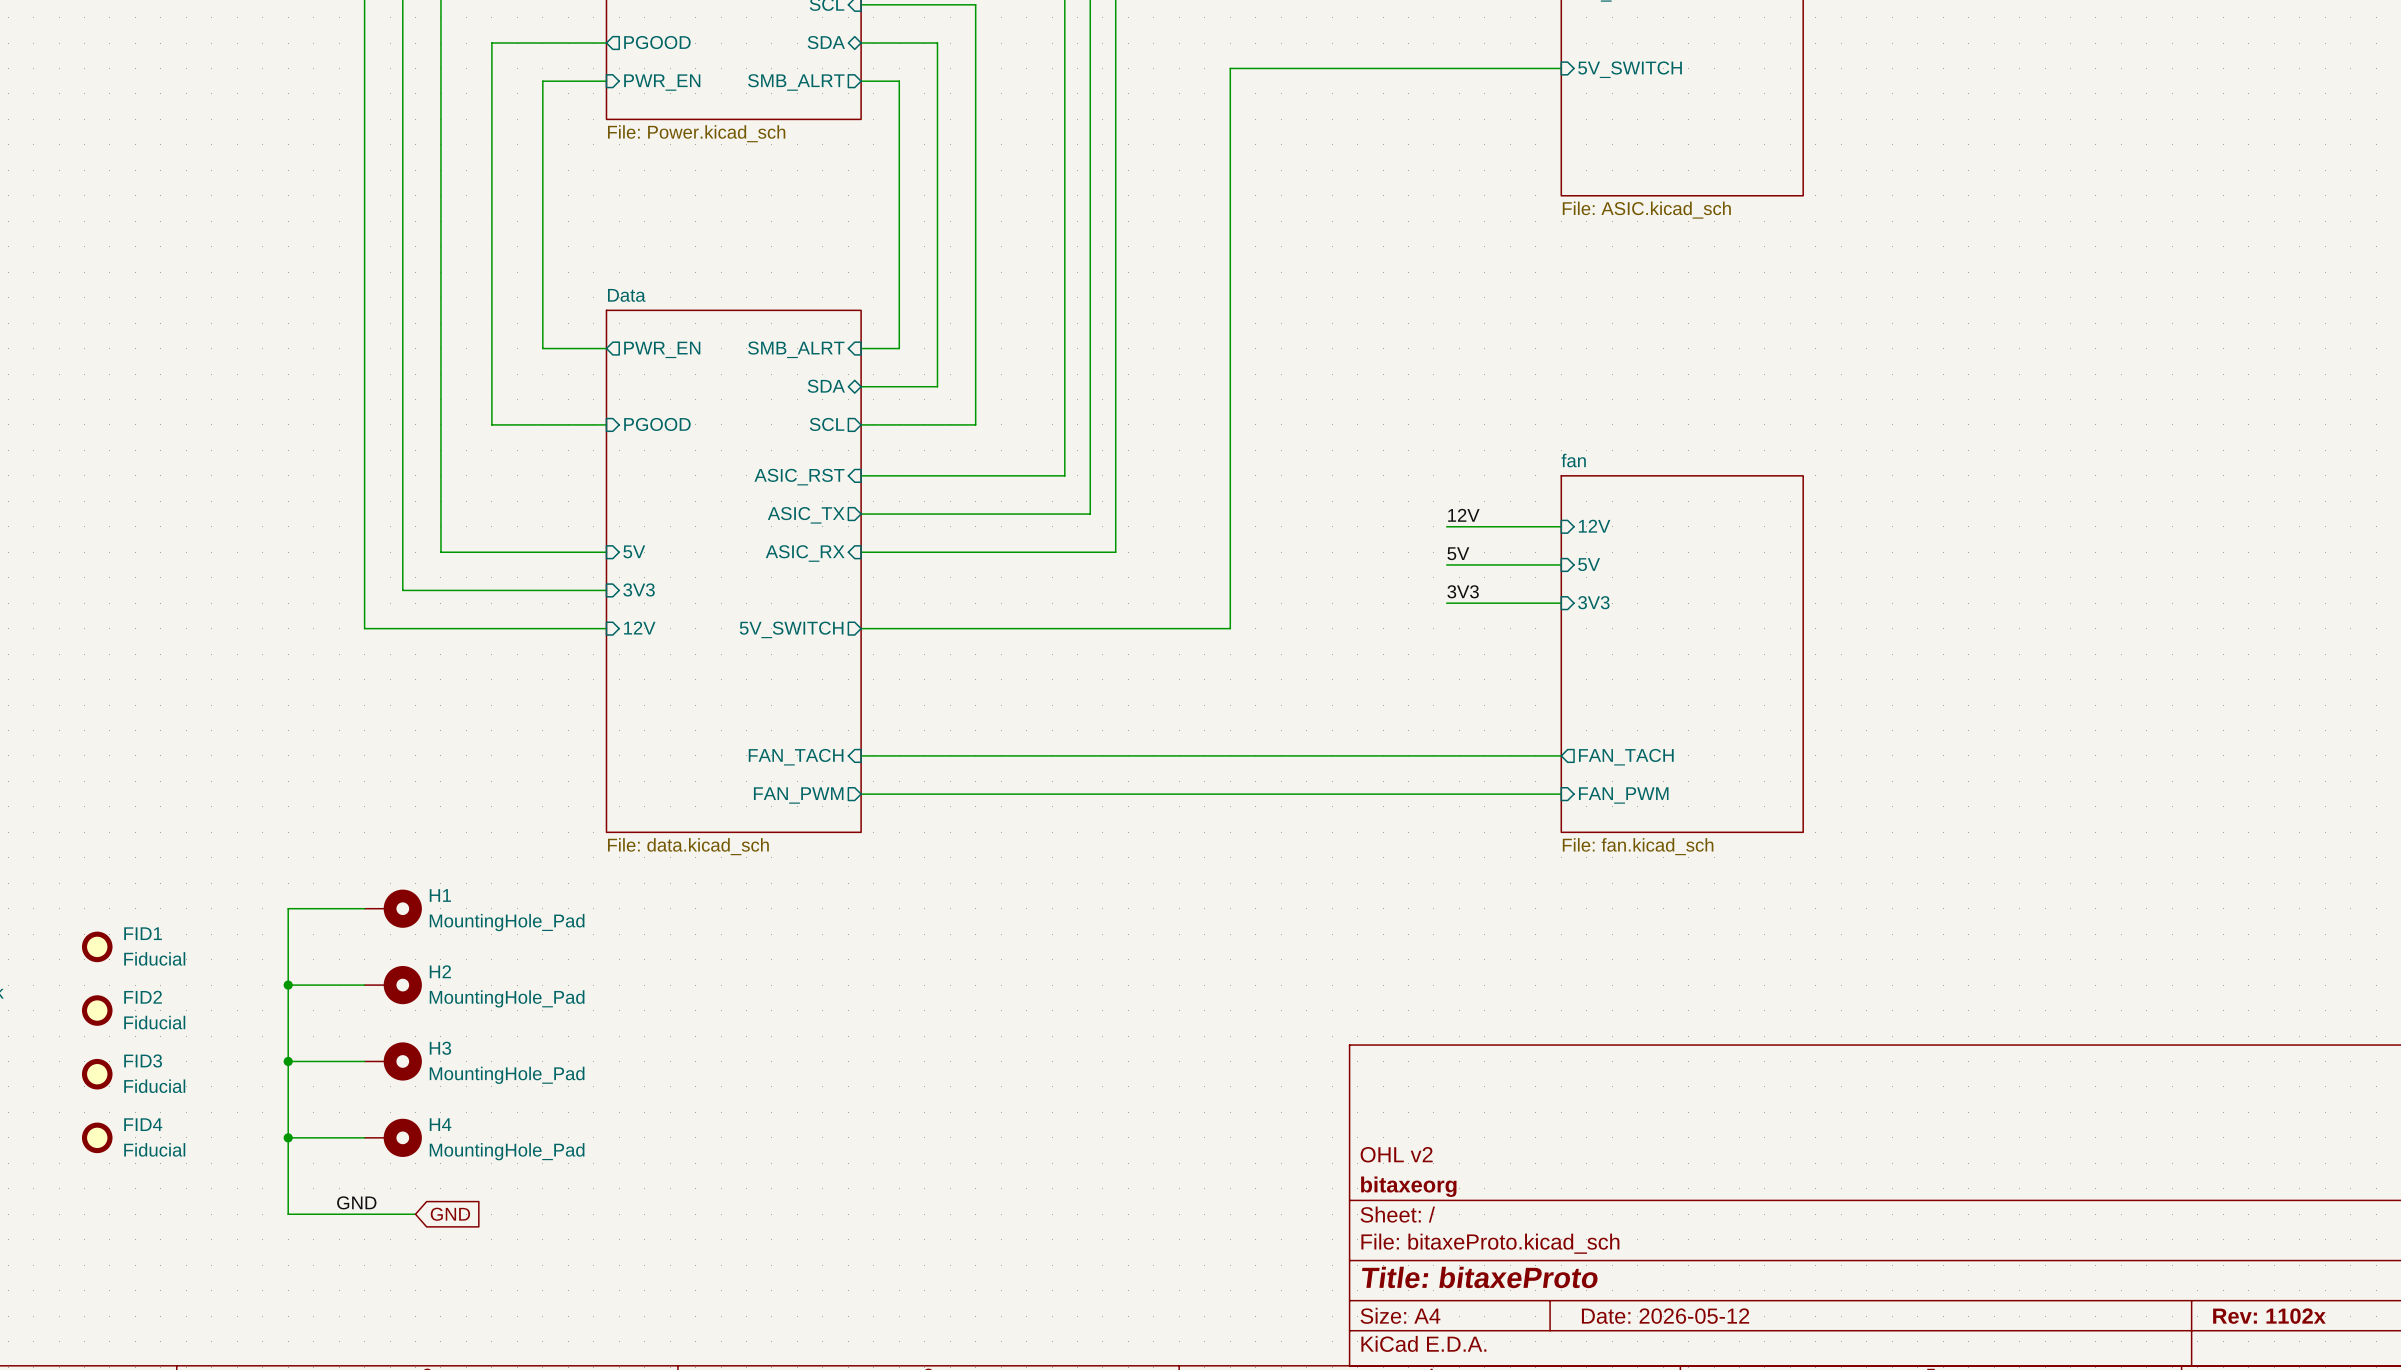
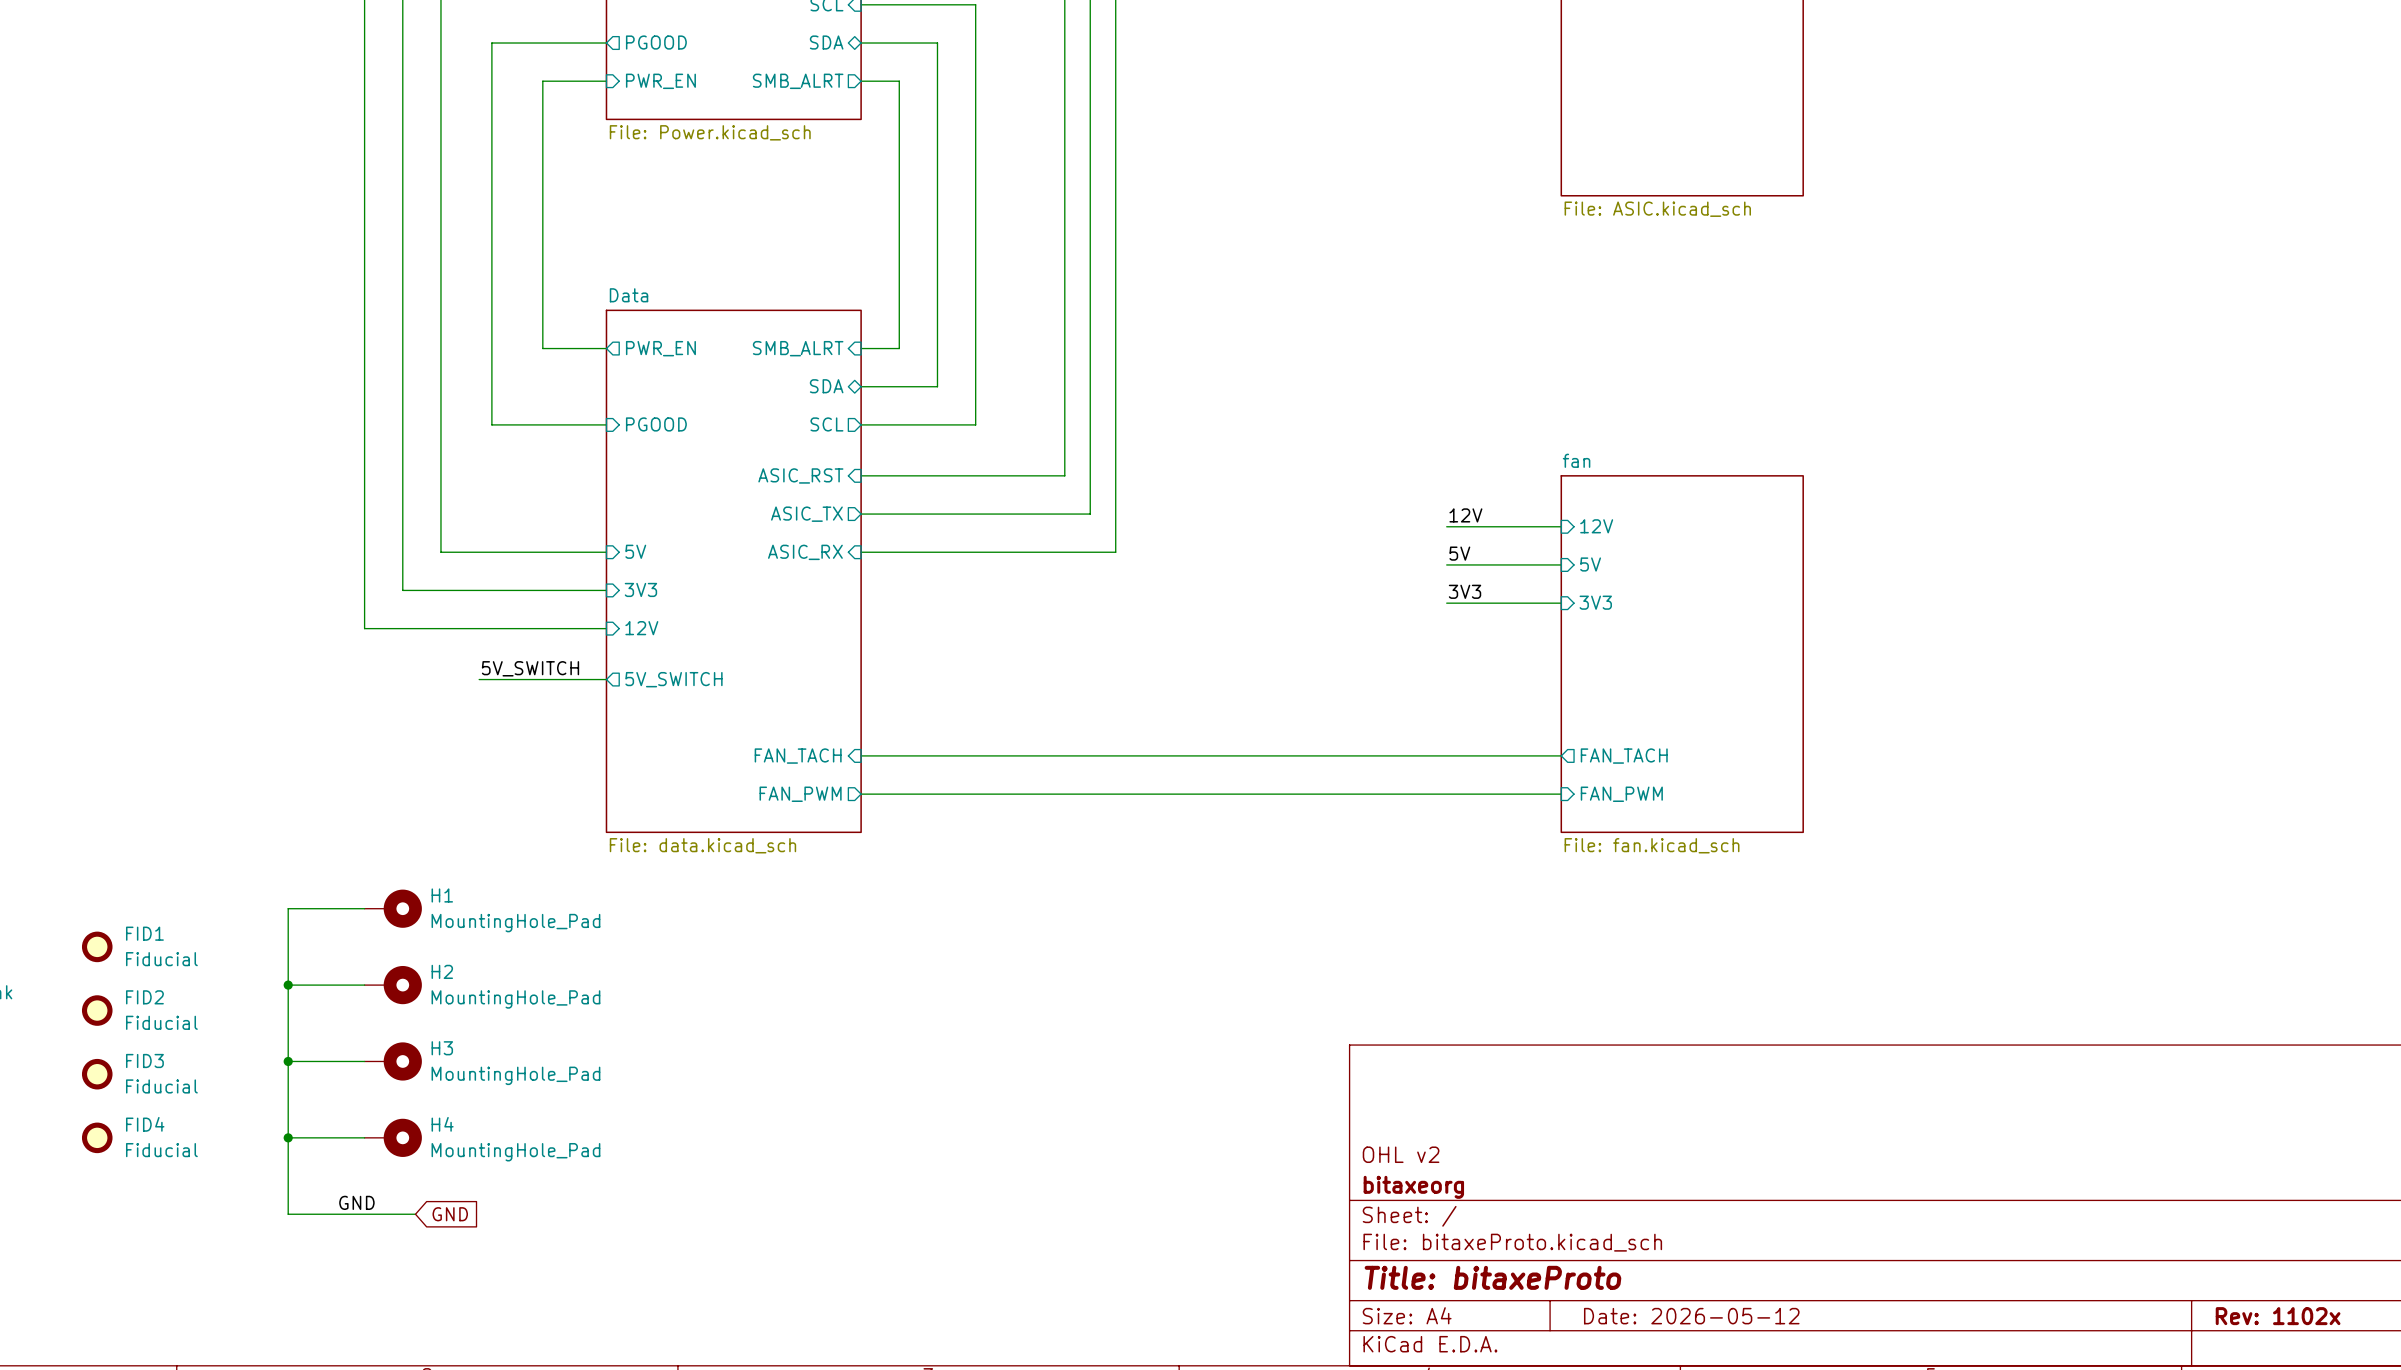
wire: (1561, 68) (1230, 68) (1230, 628) (861, 628) -> none
sheet pin: 5V_SWITCH (1630, 69) -> none
sheet pin rotation: 0° (791, 629) -> 180° (673, 679)
label: none -> 5V_SWITCH (530, 668)
wire: none -> (479, 679) (606, 679)

